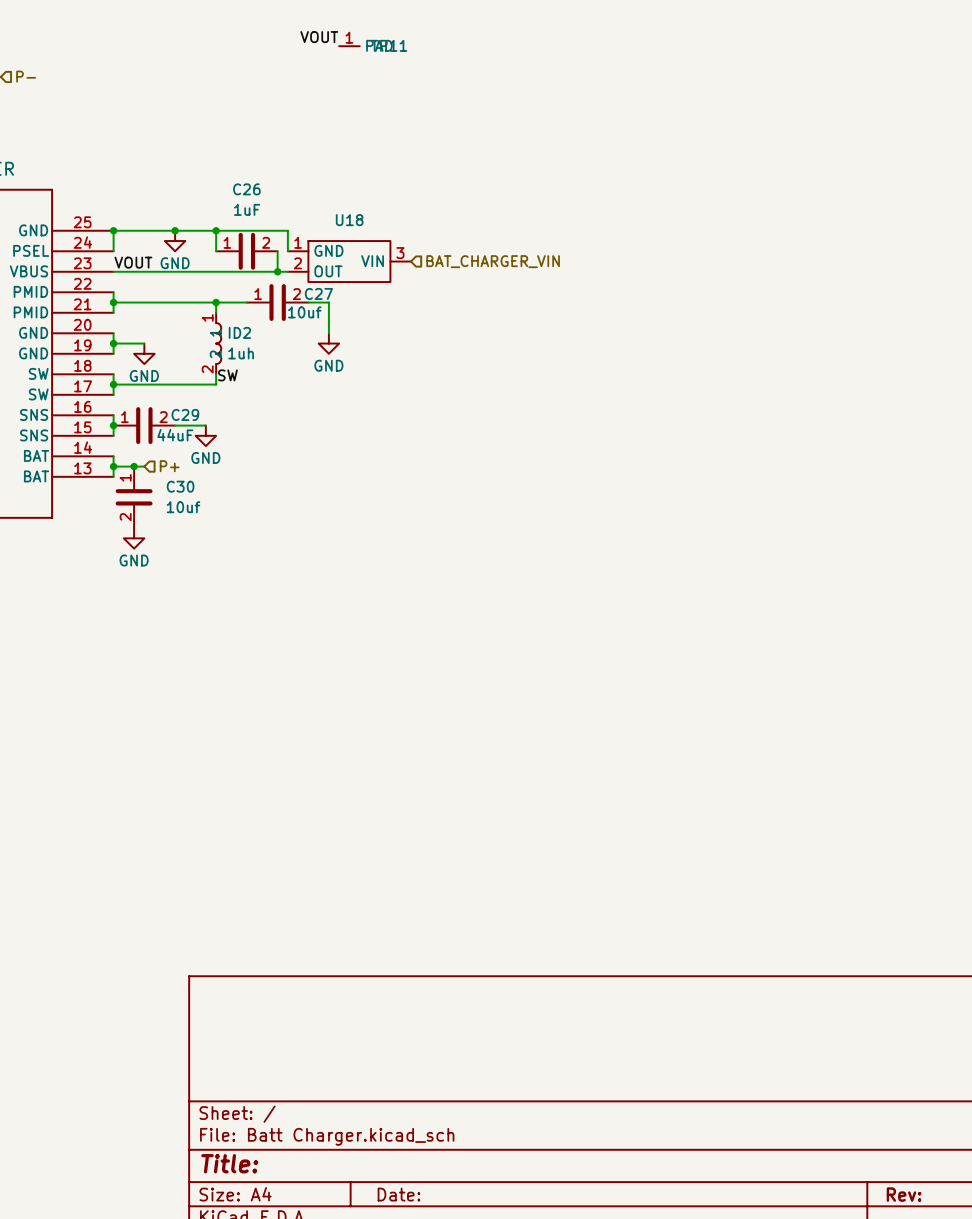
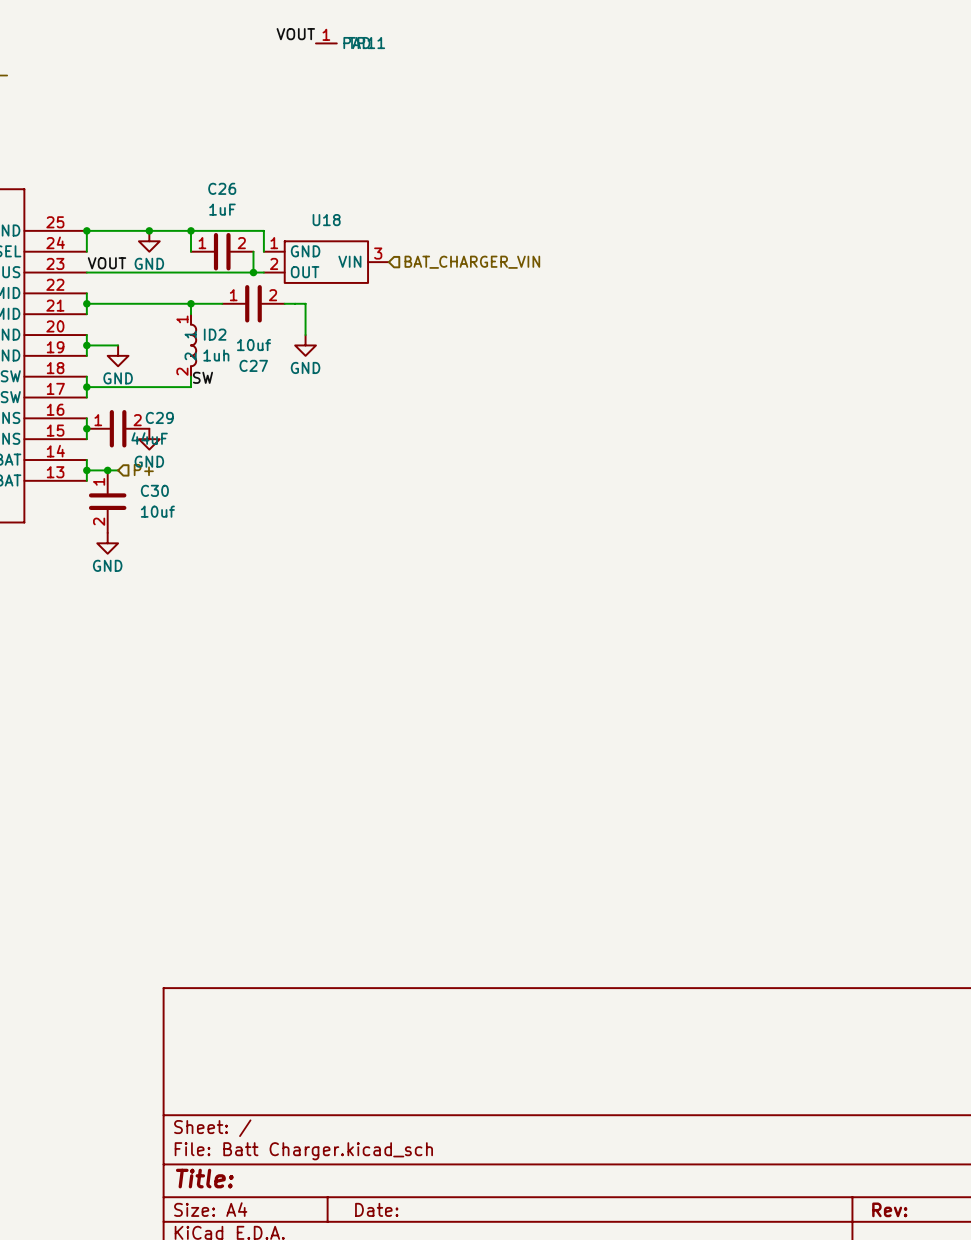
C27 name position: C27 (318, 293) -> C27 (253, 365)
C27 value position: 10uf (304, 312) -> 10uf (253, 345)
wire: (175, 425) (205, 425) -> none
power symbol position: GND (205, 435) -> GND (149, 439)

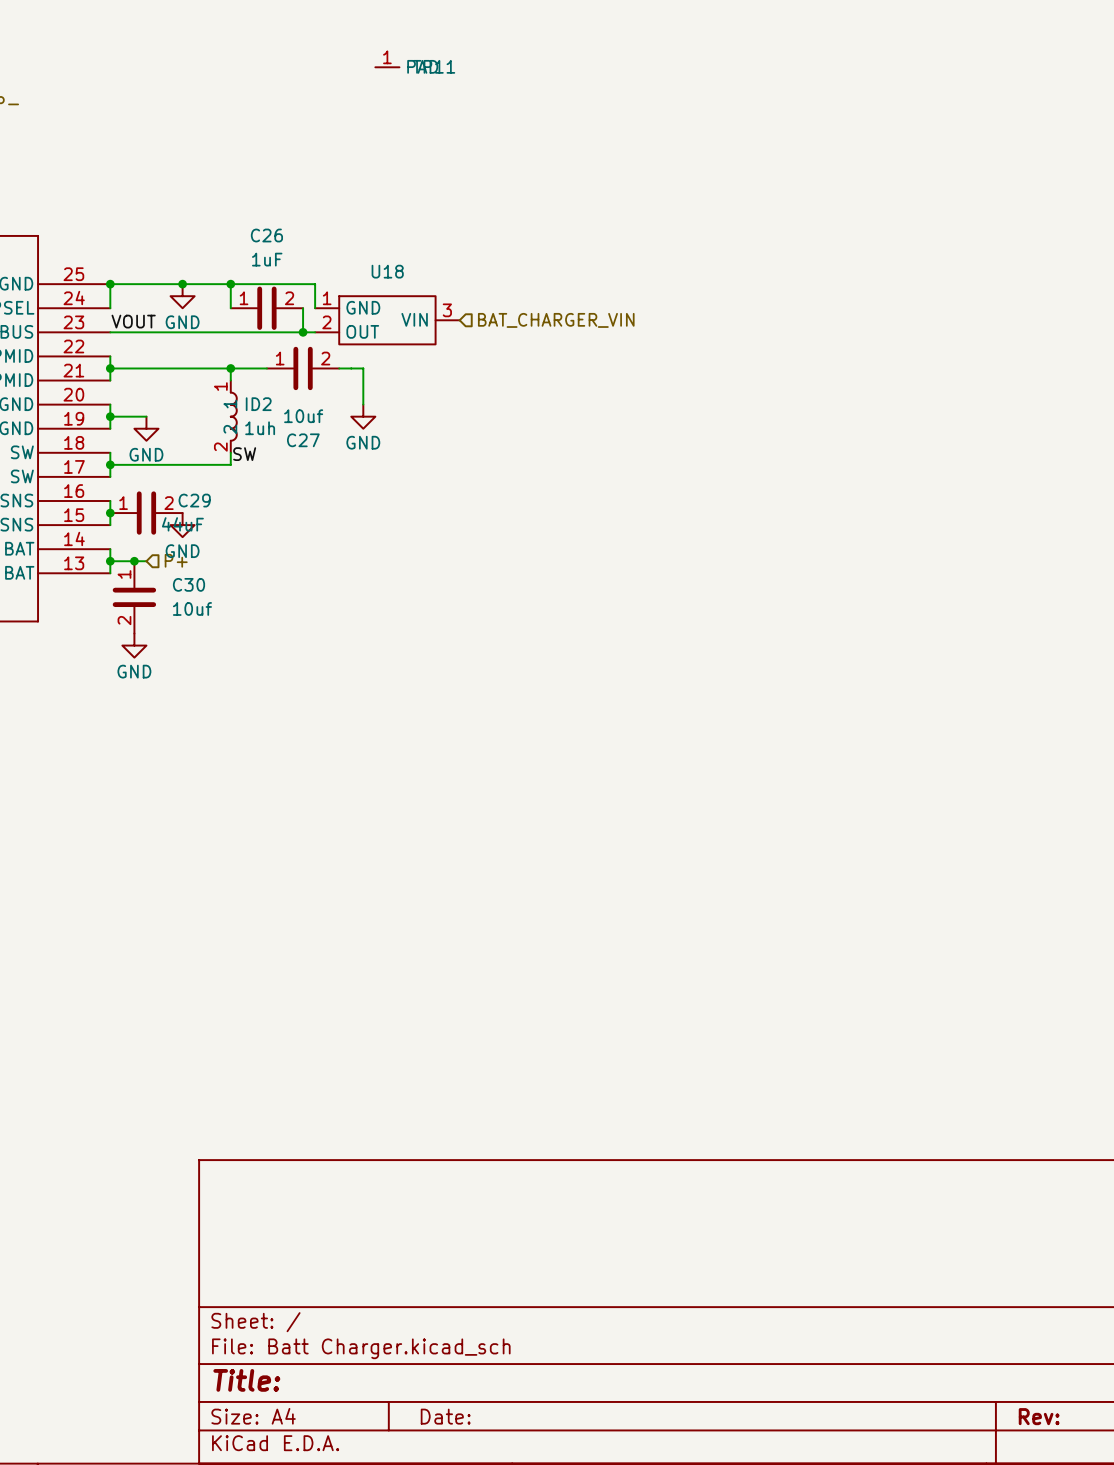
label: VOUT (295, 34) -> none

